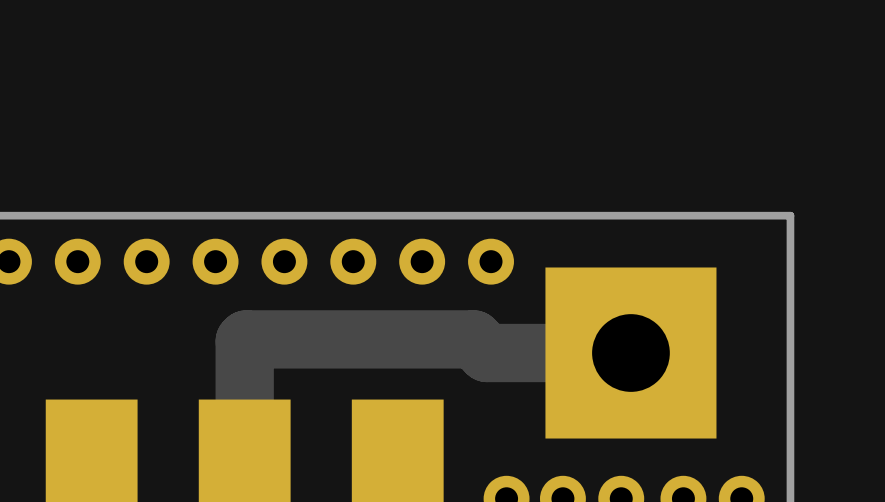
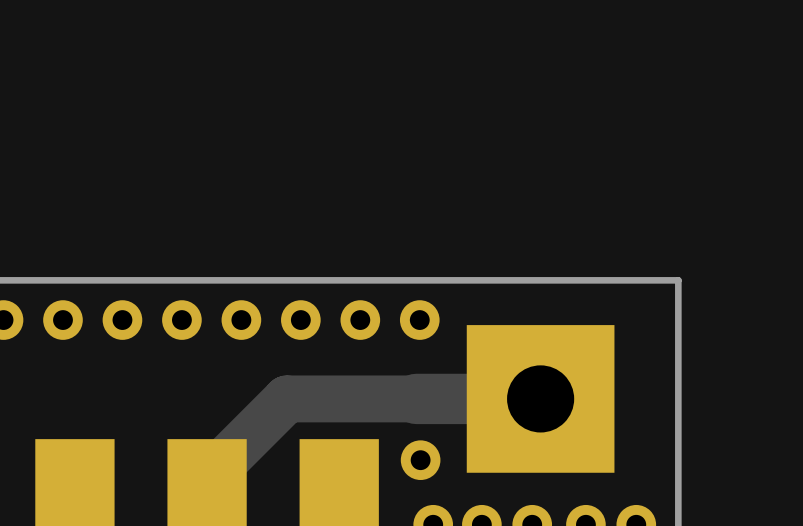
track: (487, 353) (473, 339) (246, 339) (244, 341) (244, 445) -> (416, 398) (286, 398) (207, 478)
part: none -> (420, 460)

